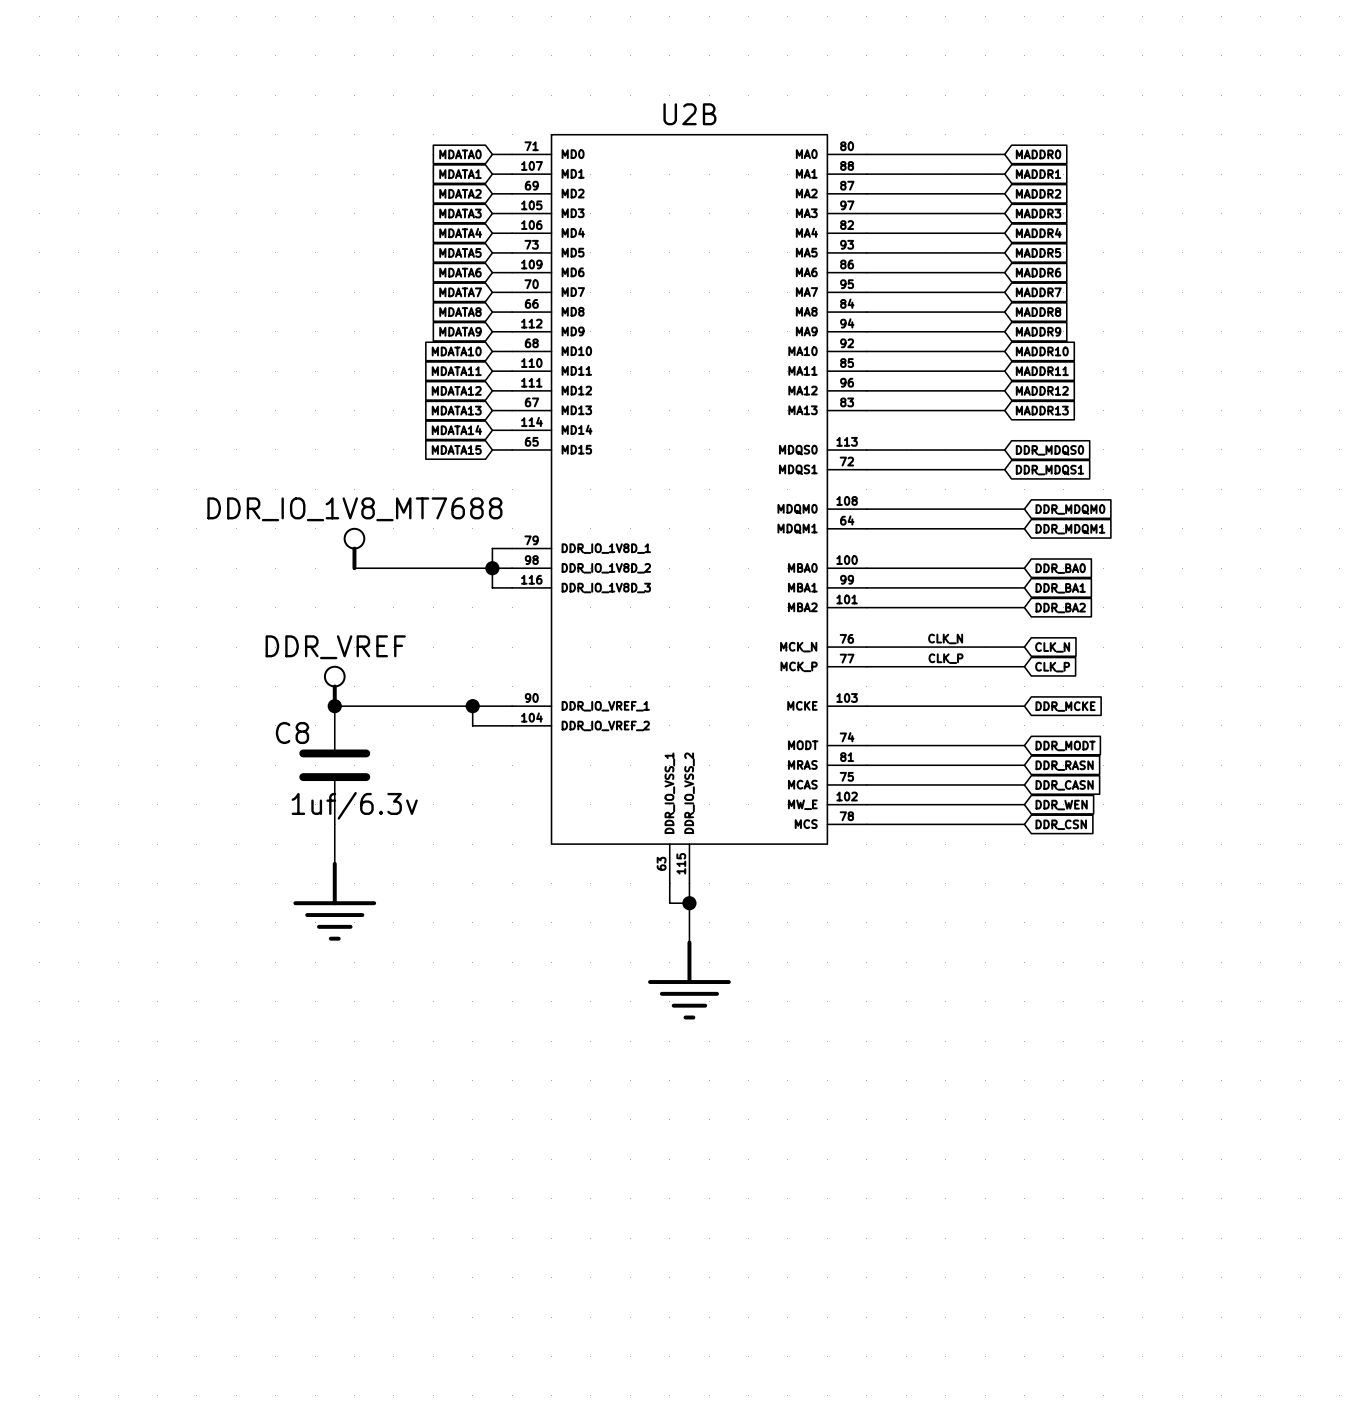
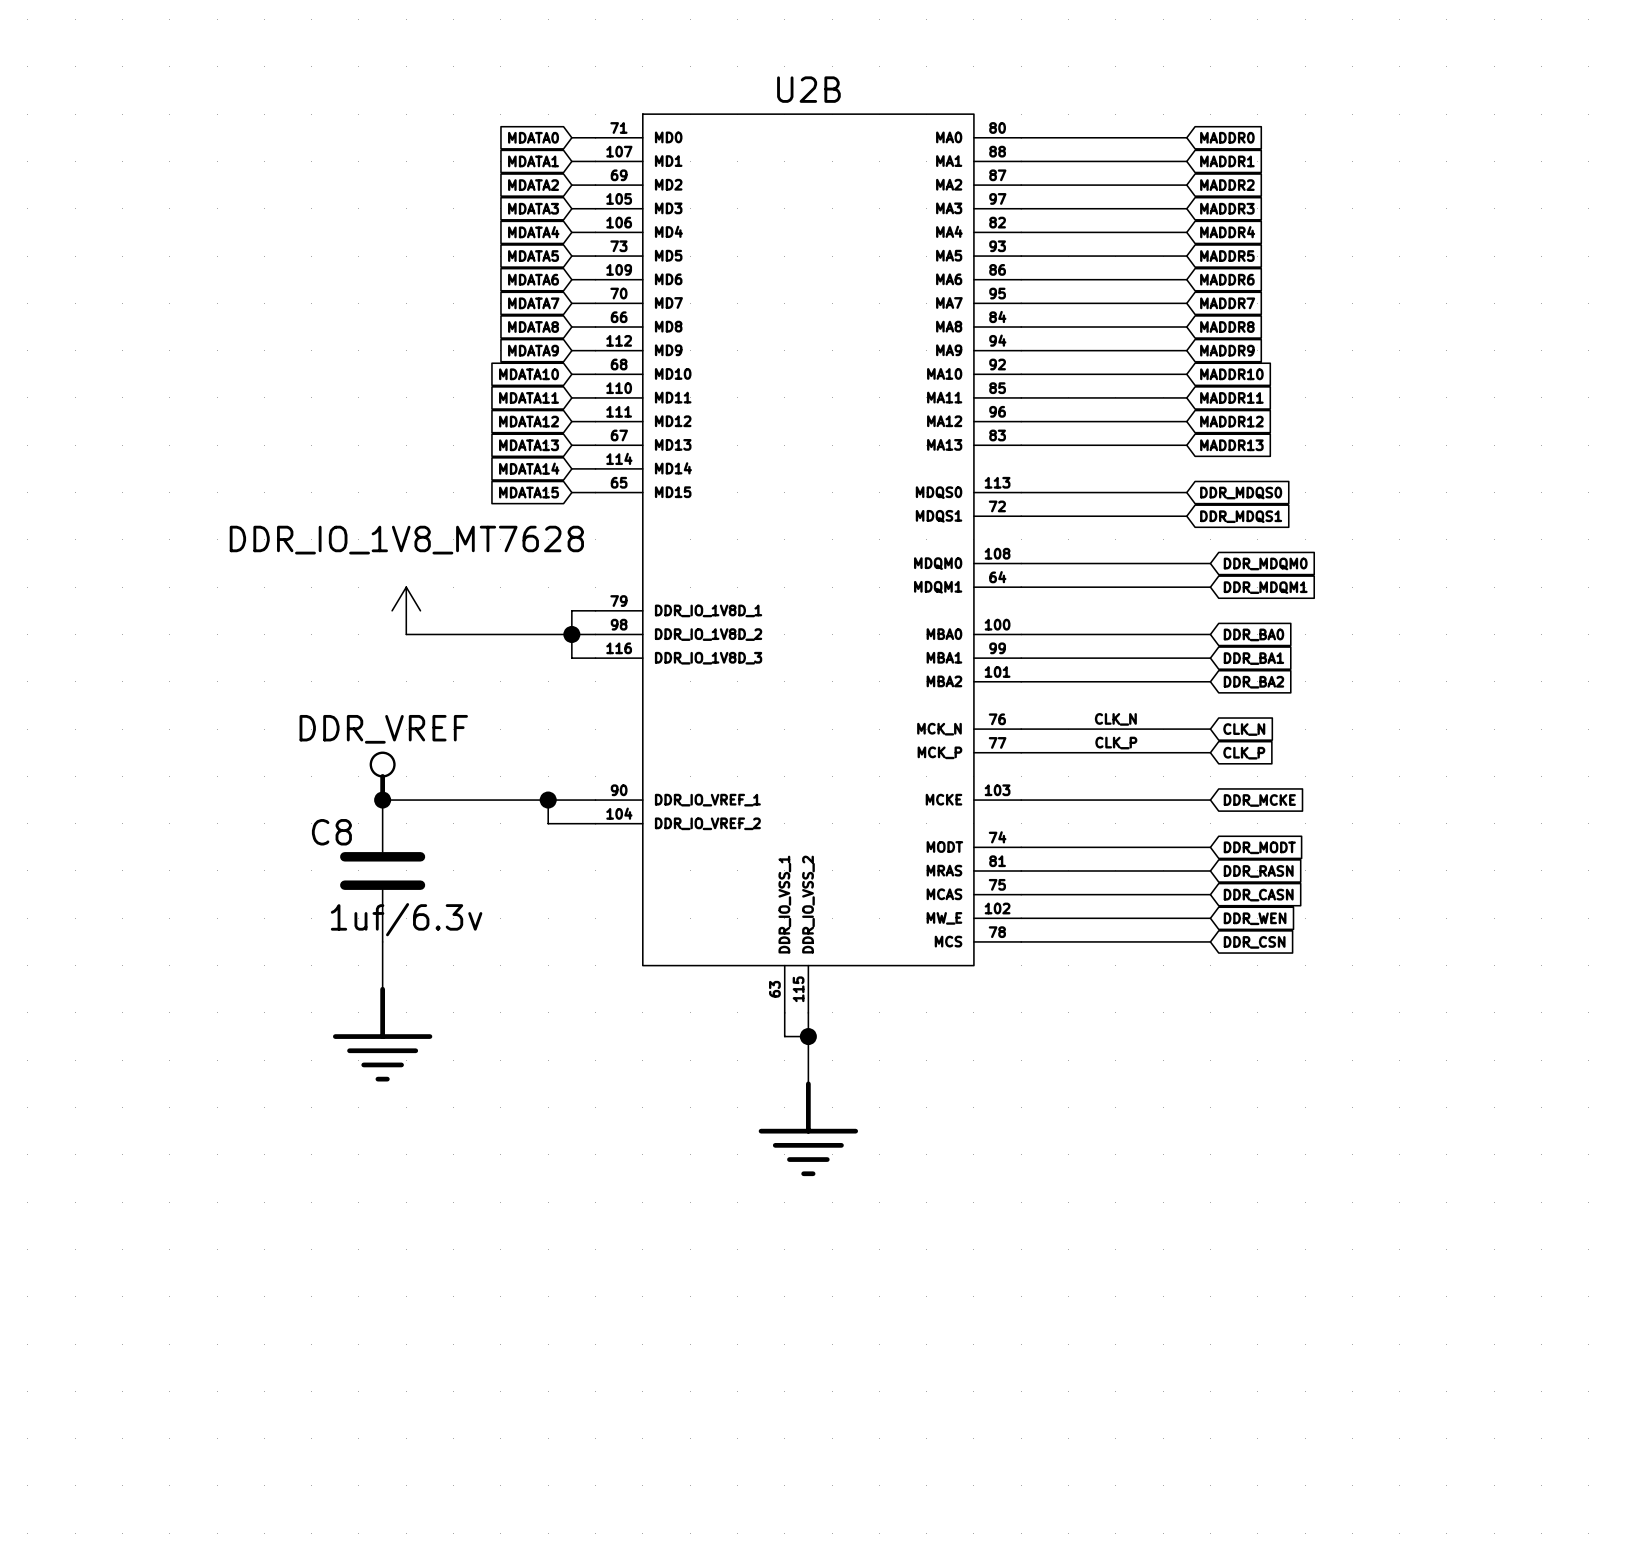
power symbol: DDR_IO_1V8_MT7688 (354, 549) -> DDR_IO_1V8_MT7628 (406, 610)

